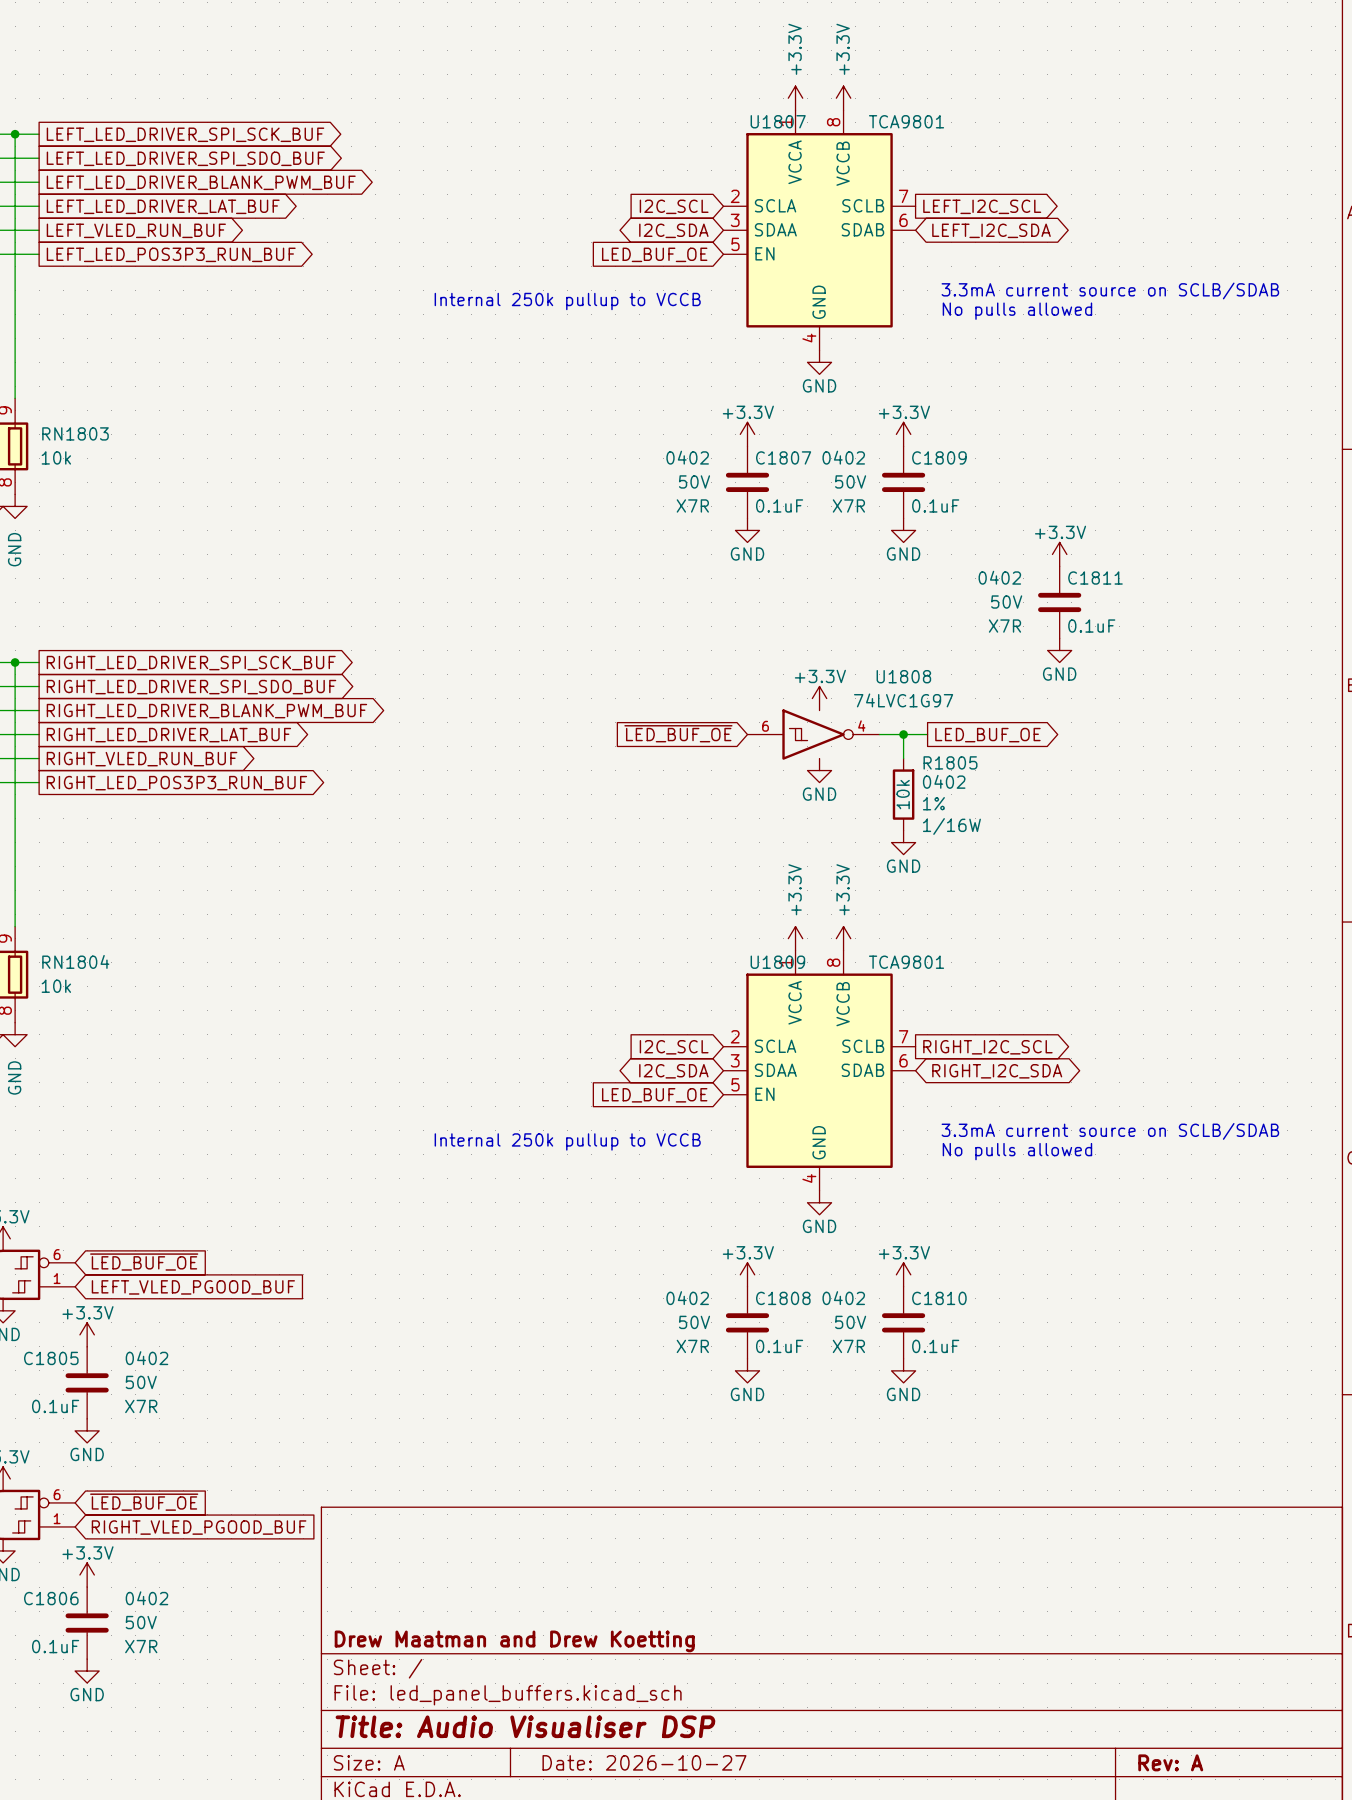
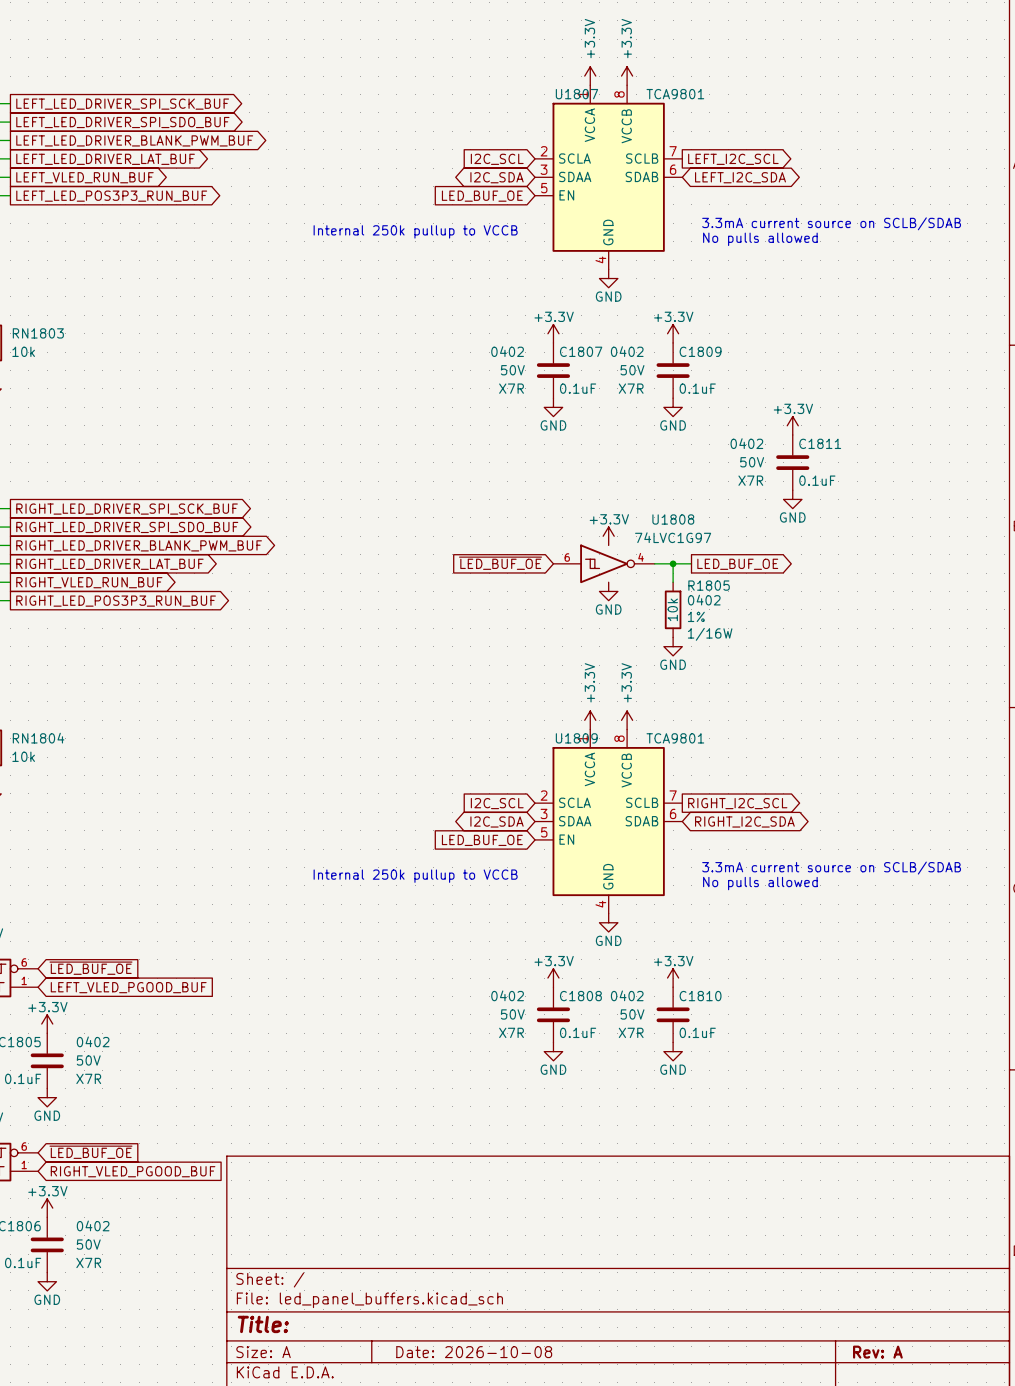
title block: Drew Maatman and Drew Koetting (514, 1641) -> none
title block: Title: Audio Visualiser DSP (525, 1726) -> Title: (263, 1324)
title block: Date: 2026-10-27 (644, 1762) -> Date: 2026-10-08 (474, 1352)

